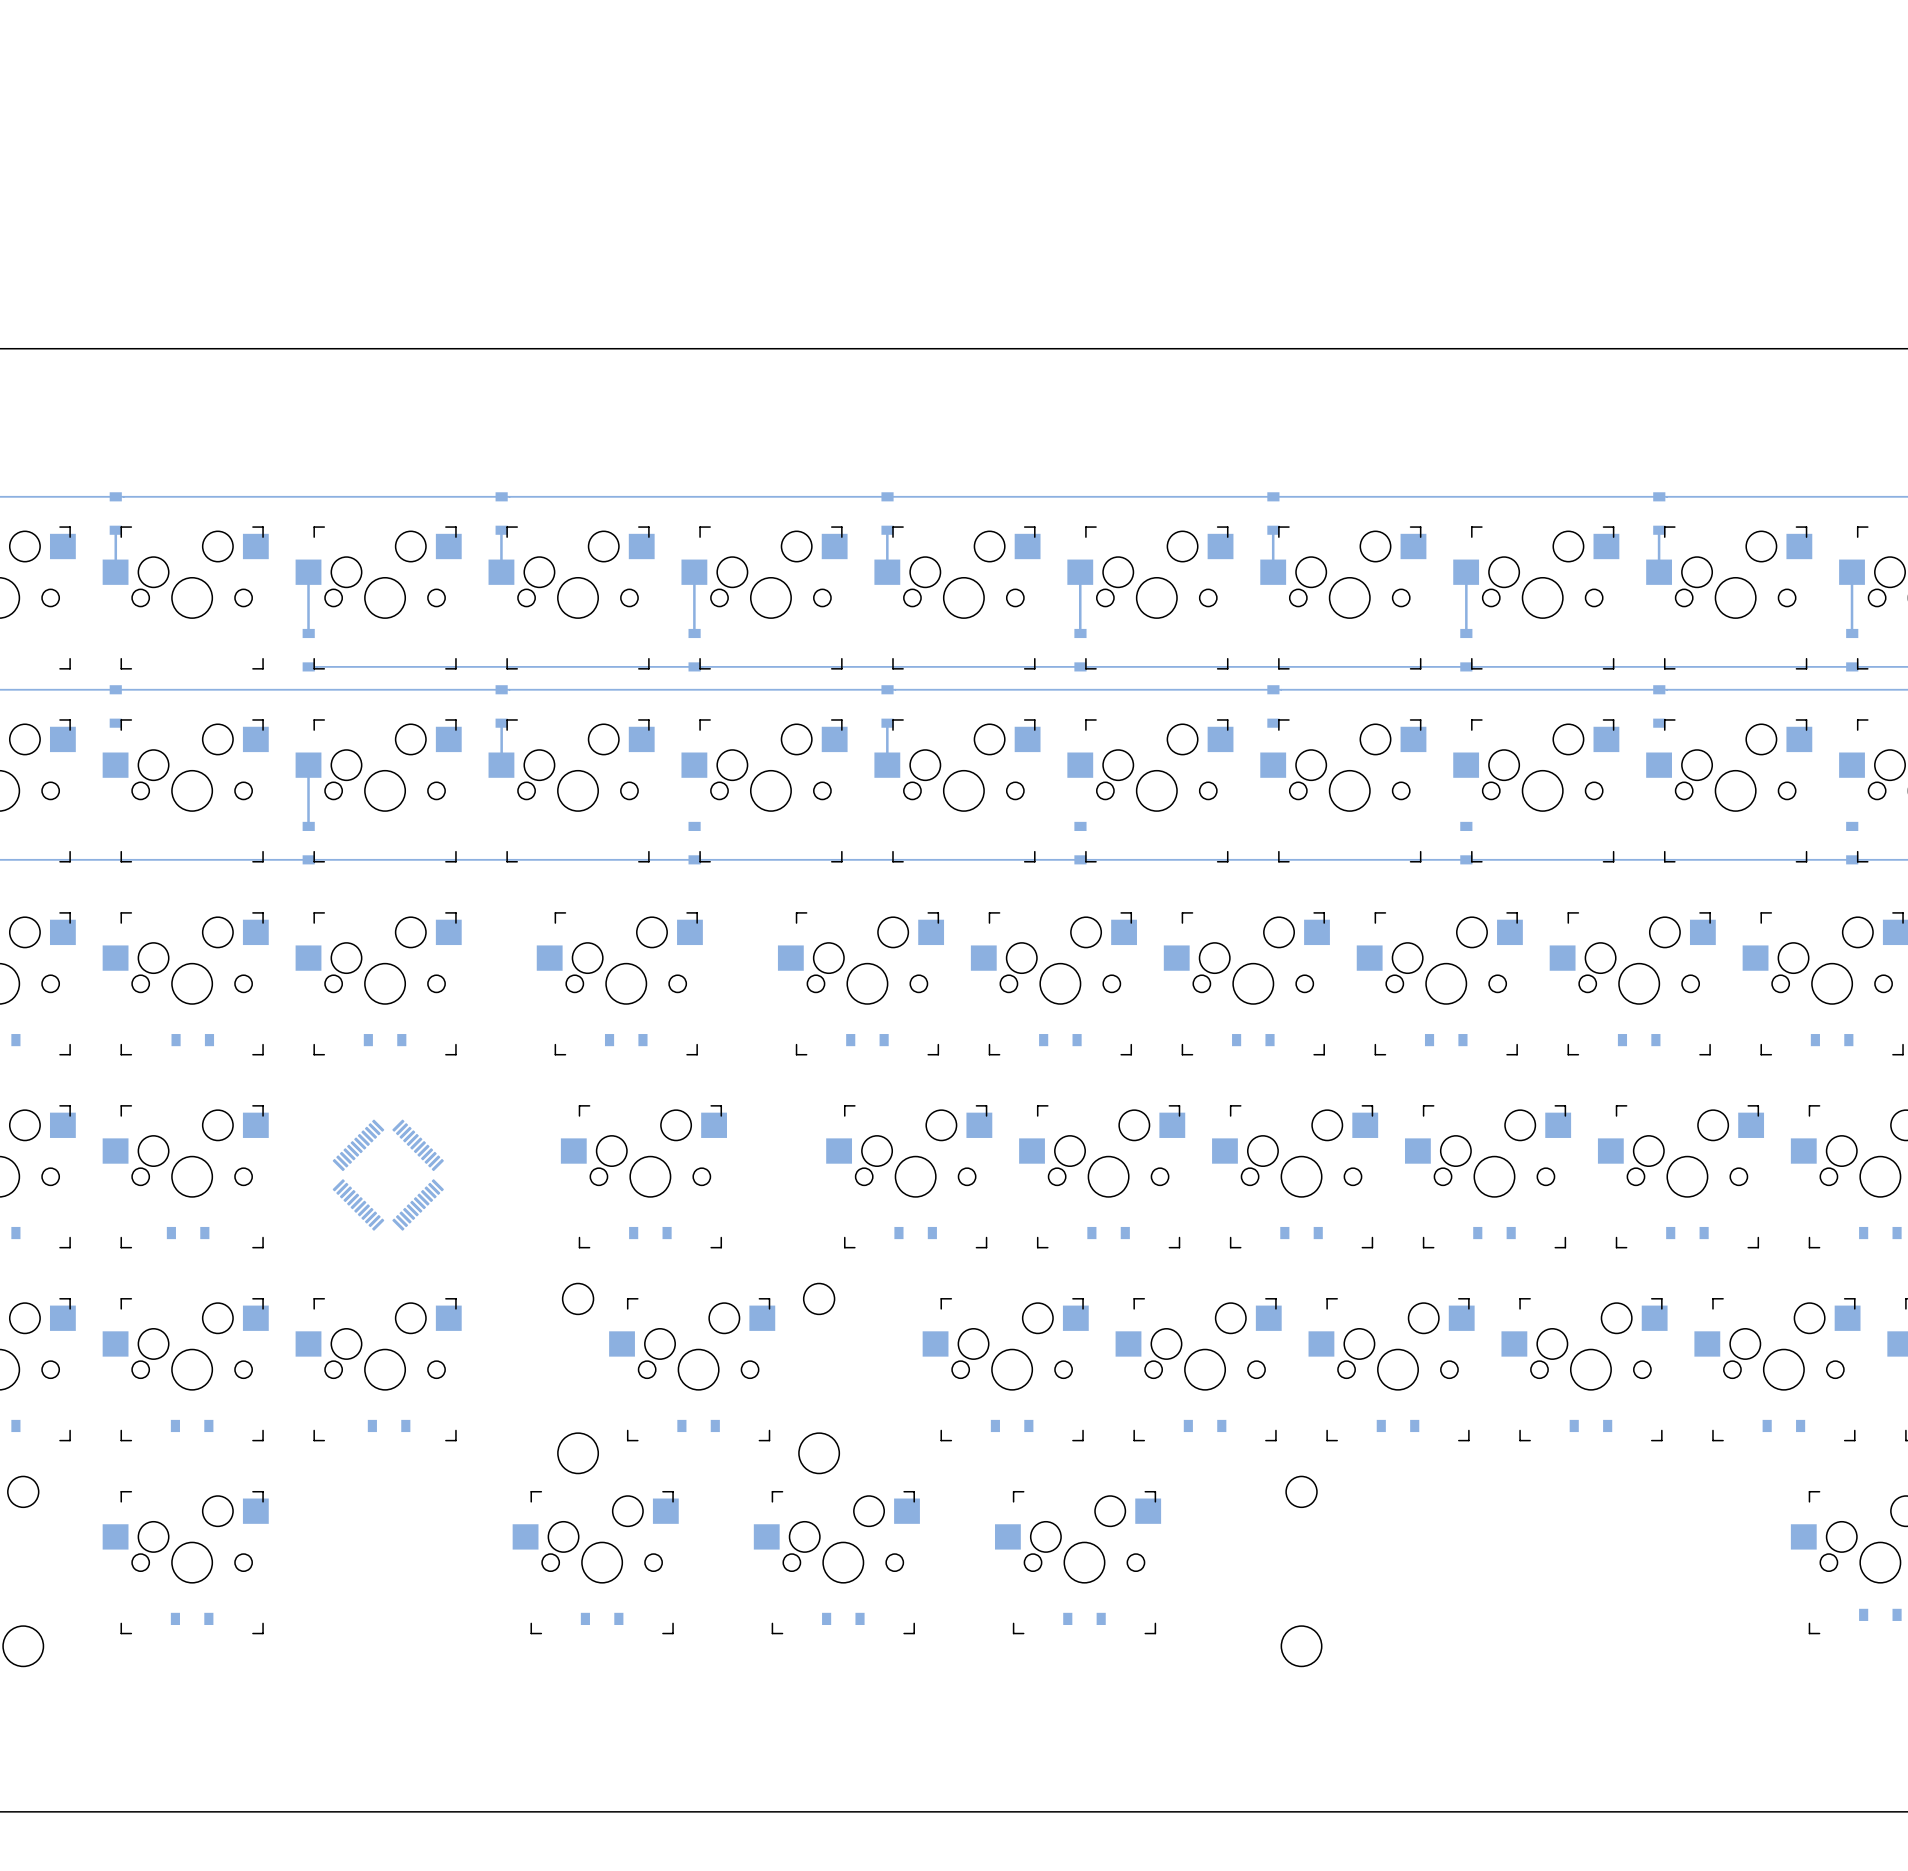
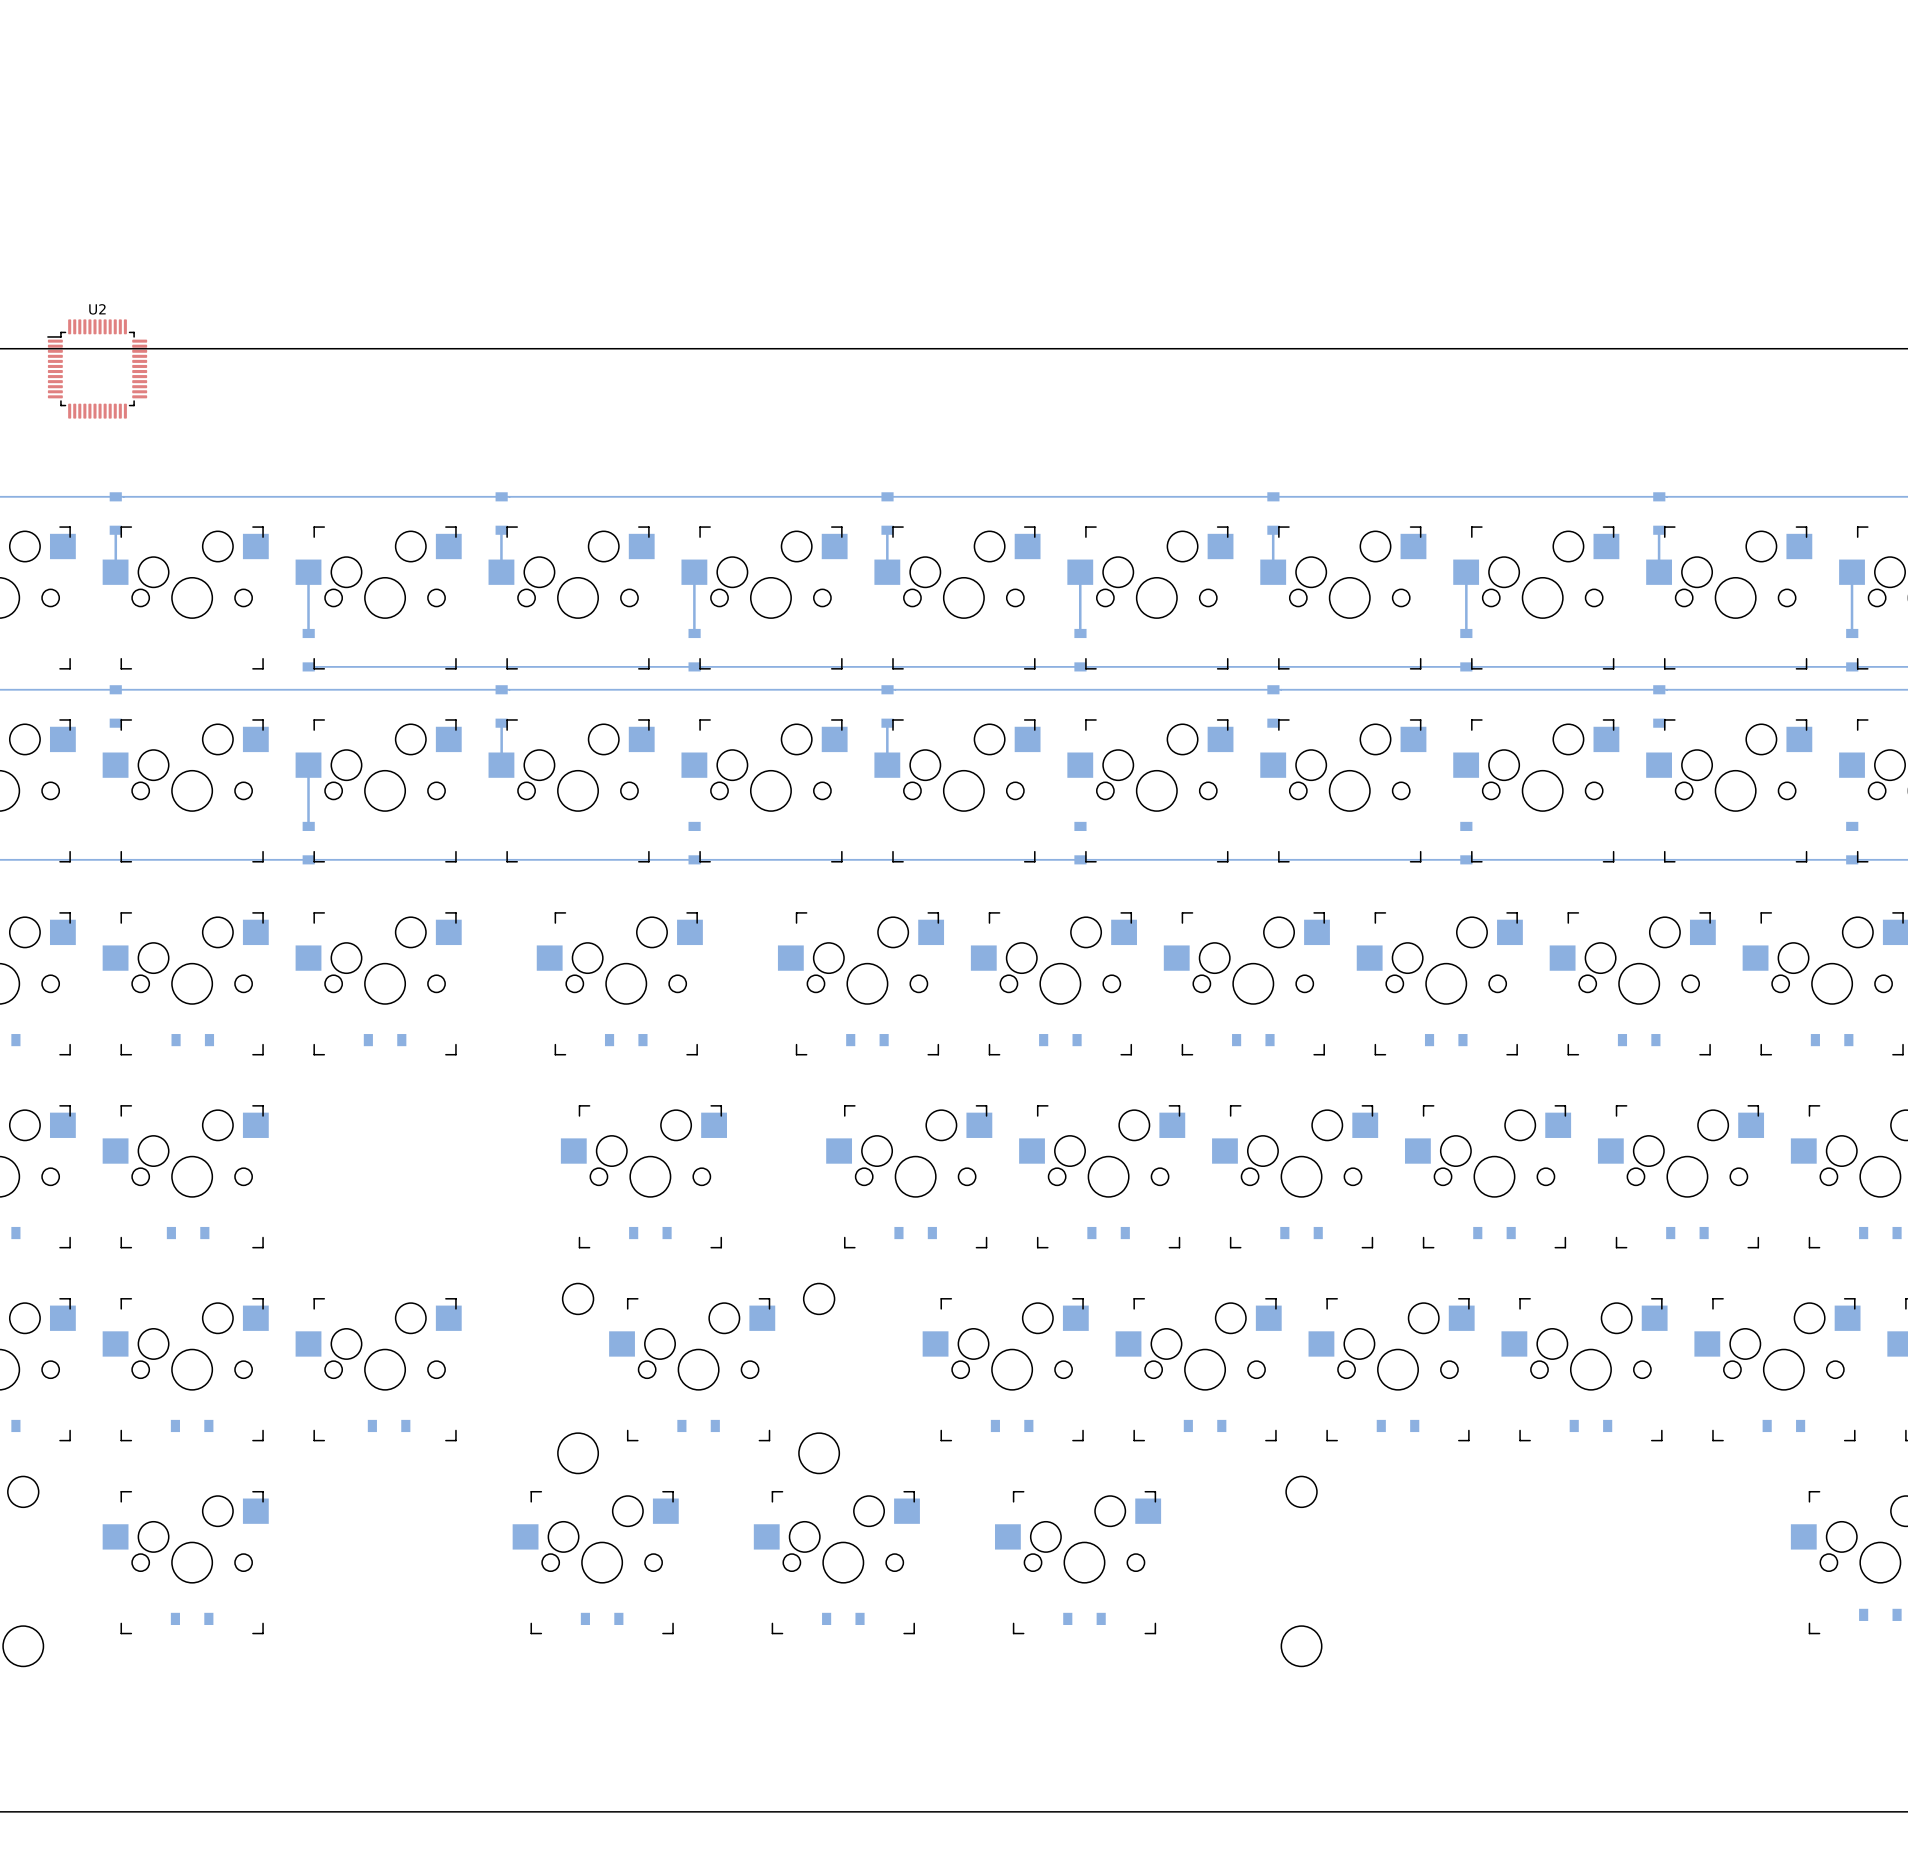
U2: none -> (97, 368)
part: (388, 1175) -> none

